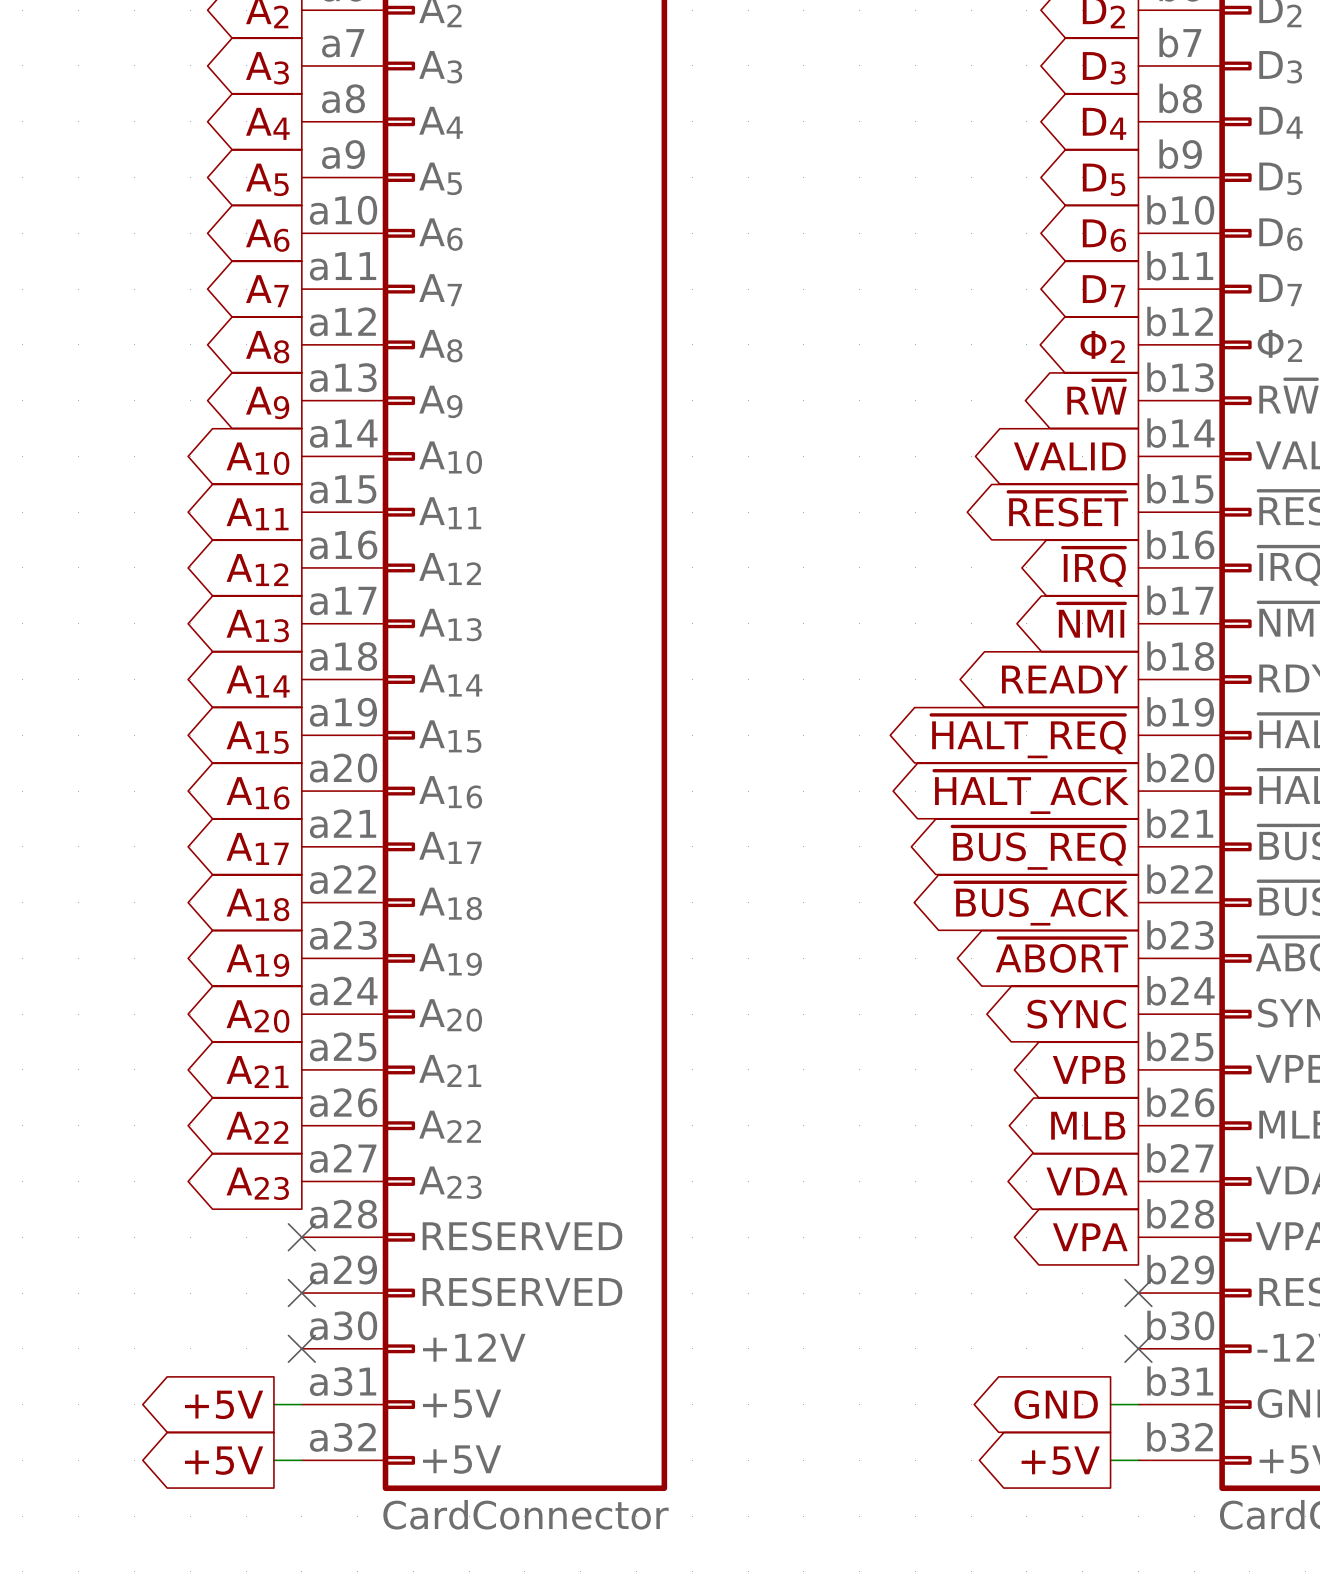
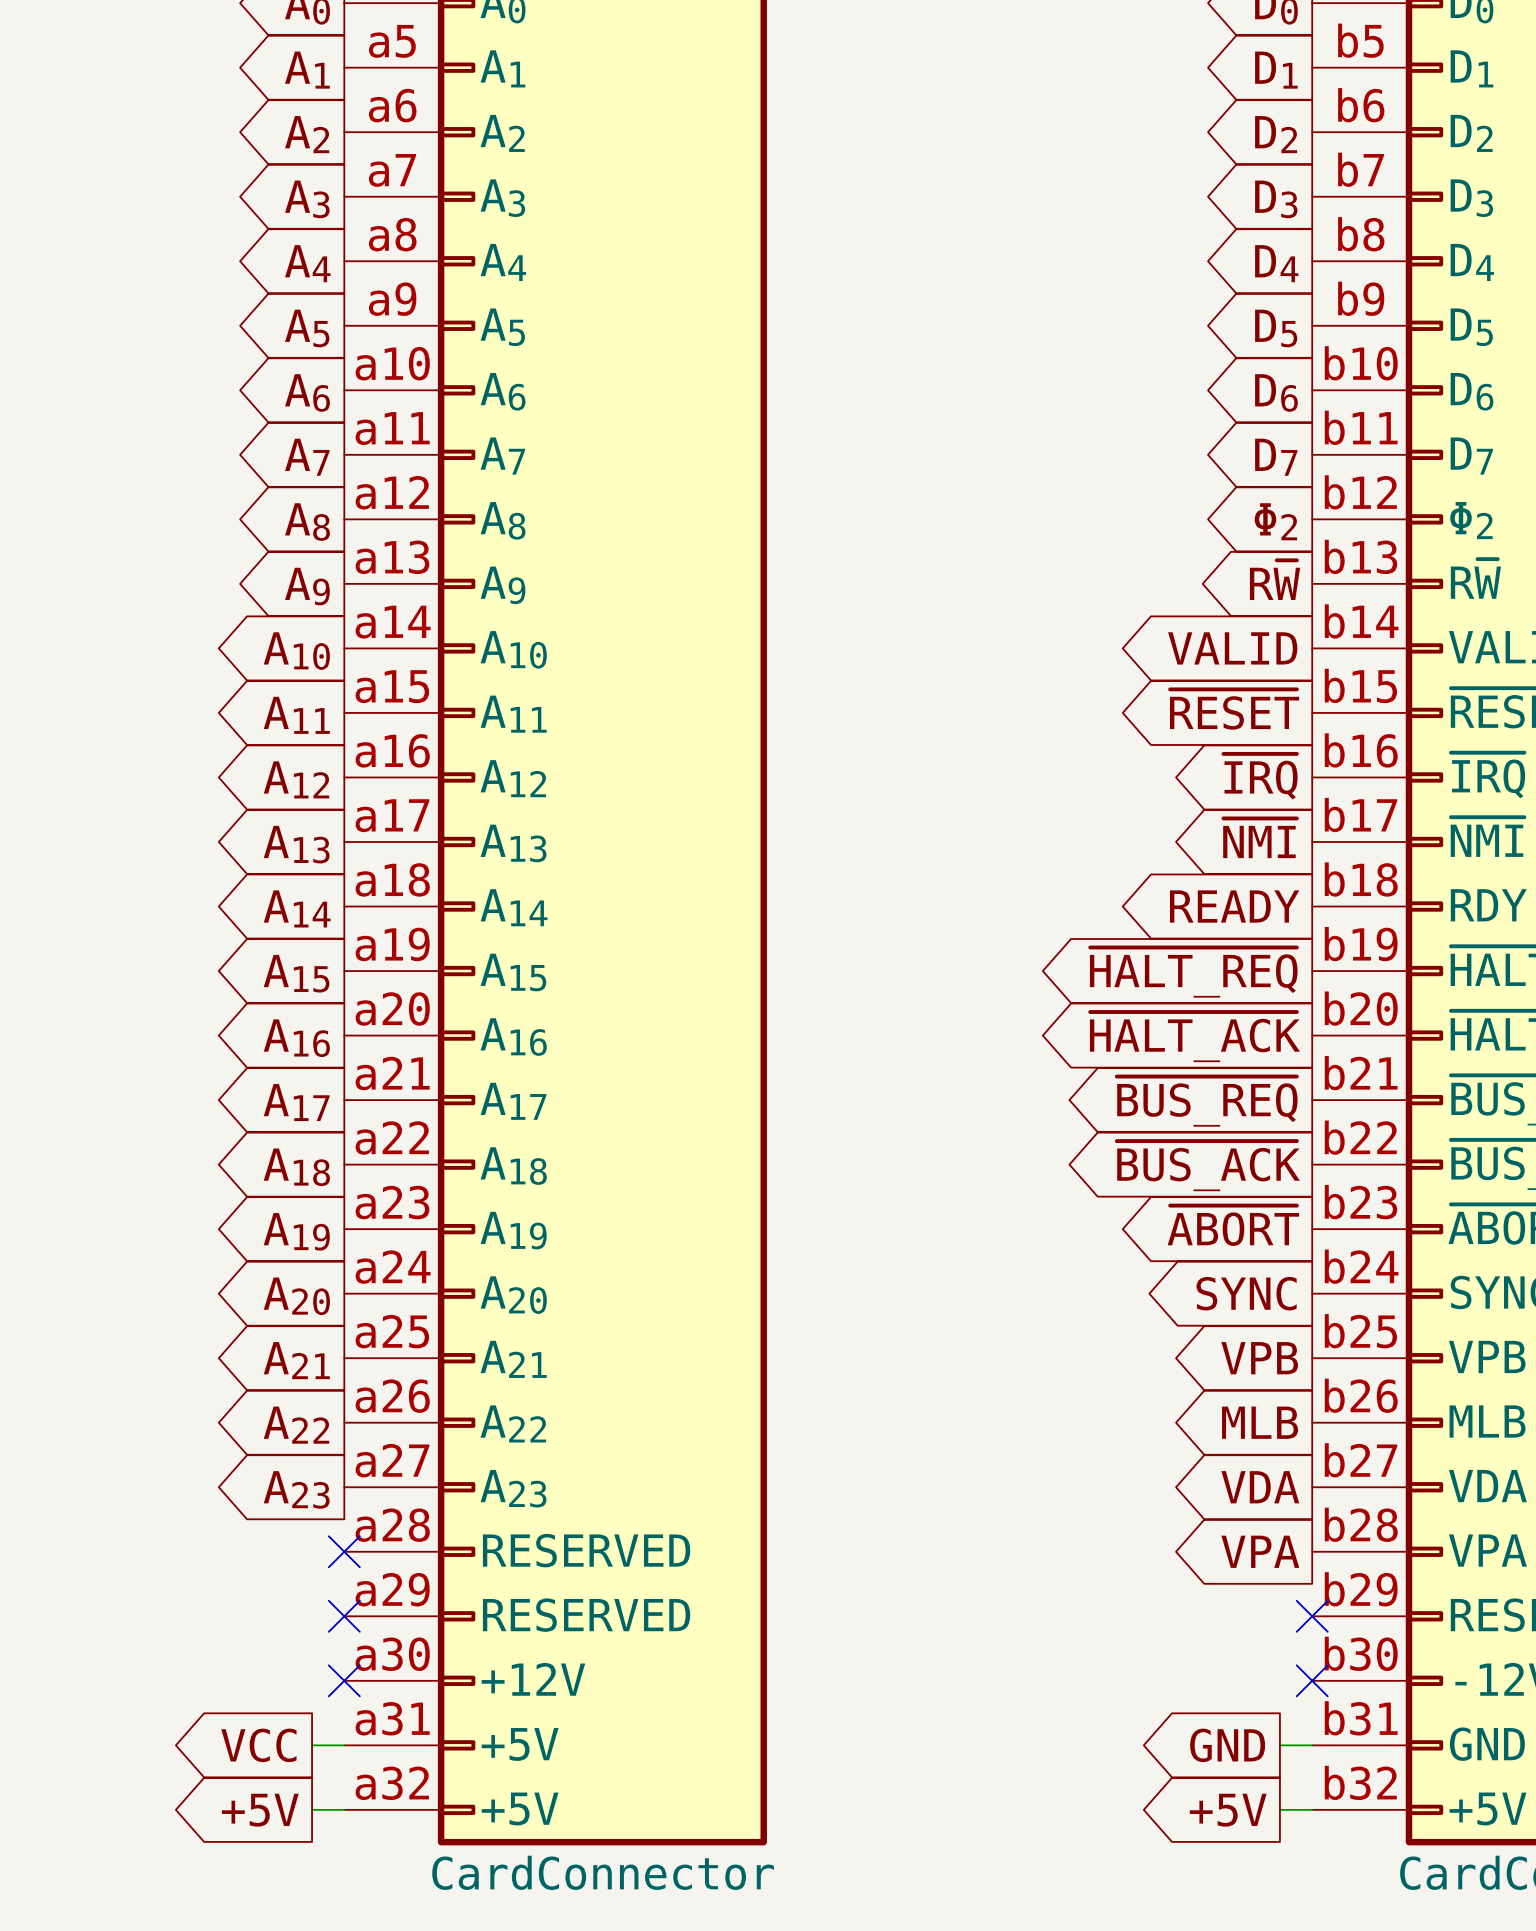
global label: +5V (224, 1404) -> VCC (258, 1745)

